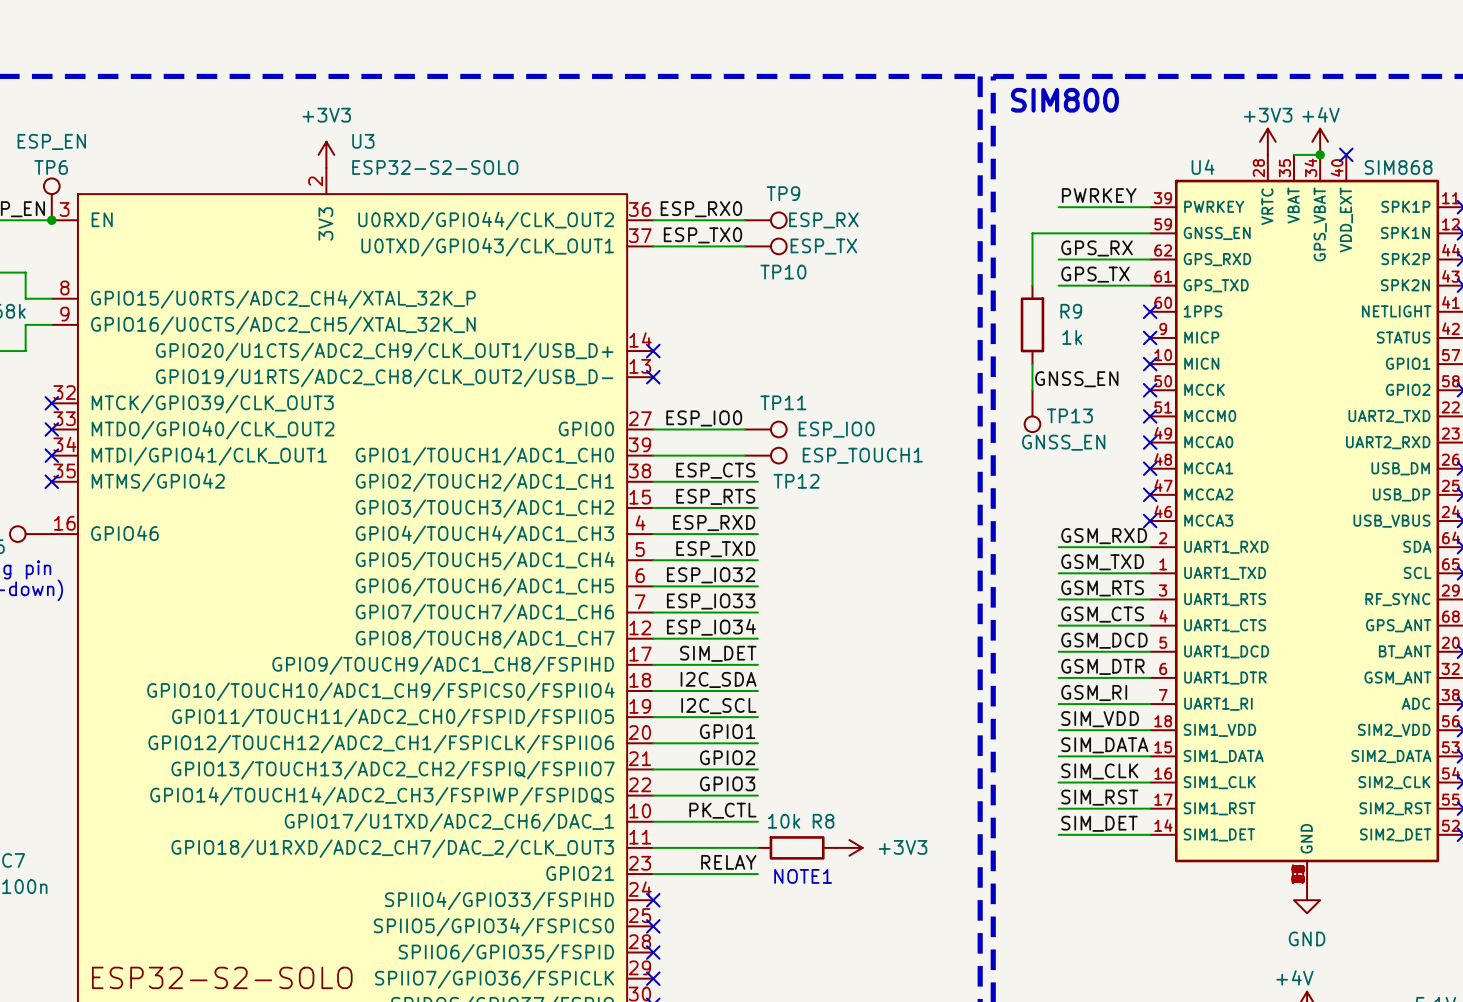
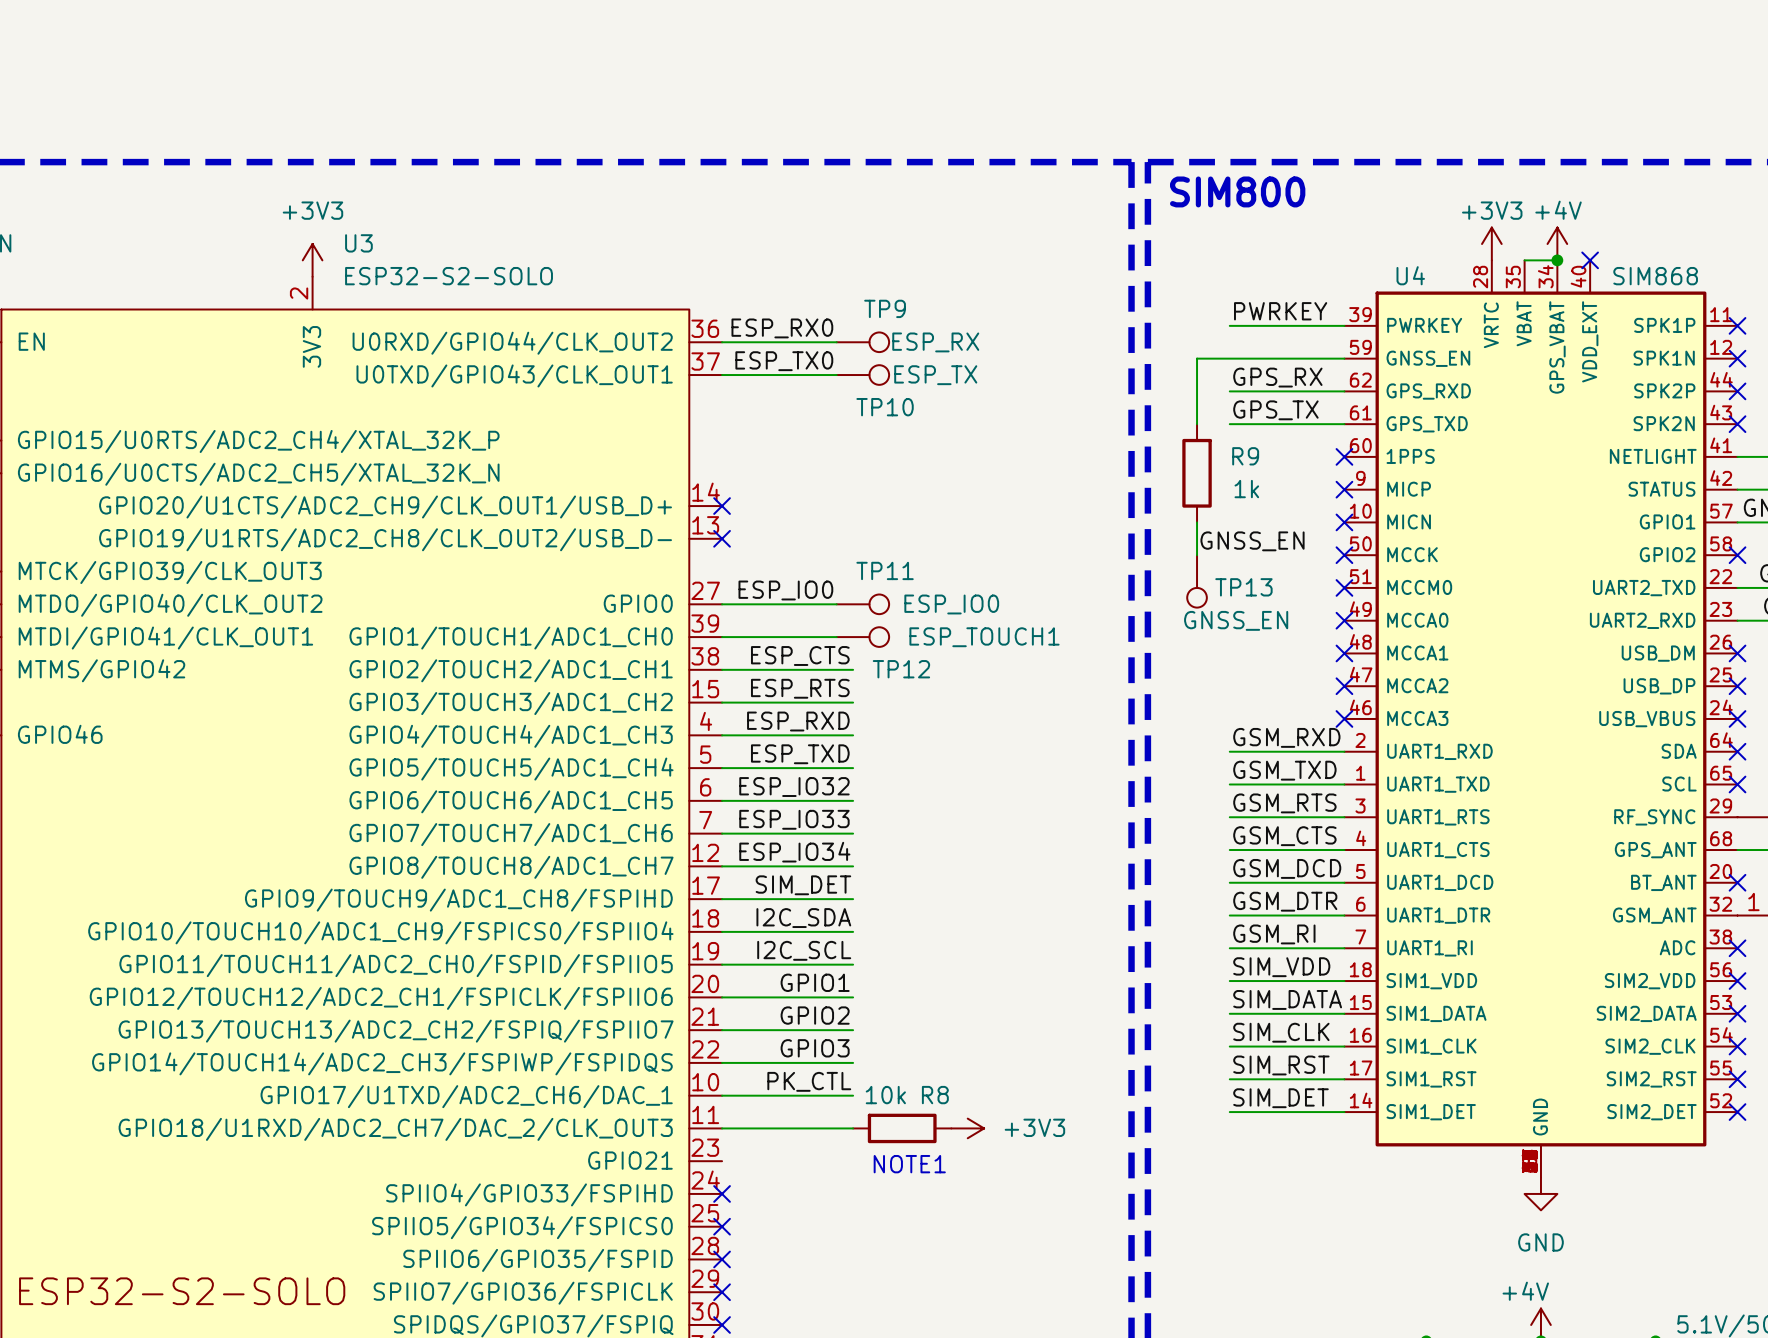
label: RELAY (728, 862) -> none
wire: (653, 874) (757, 874) -> none

